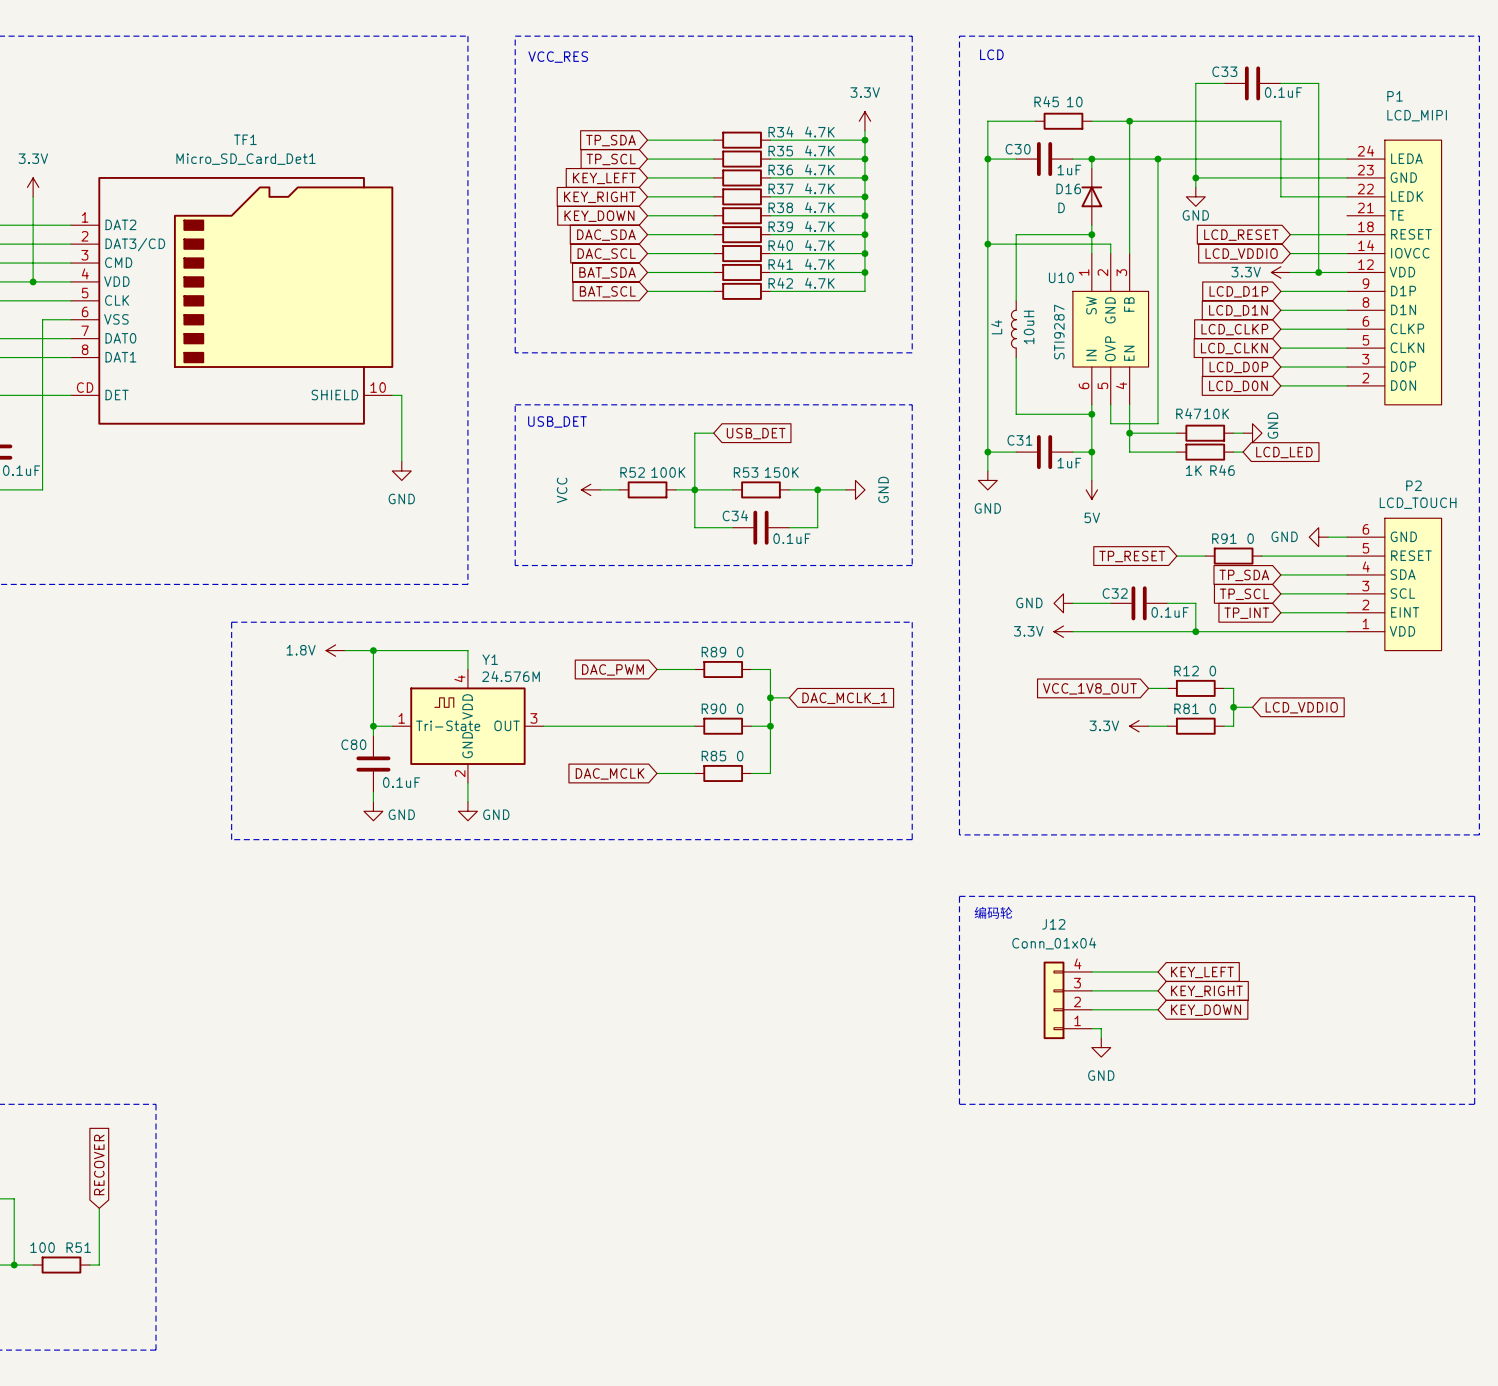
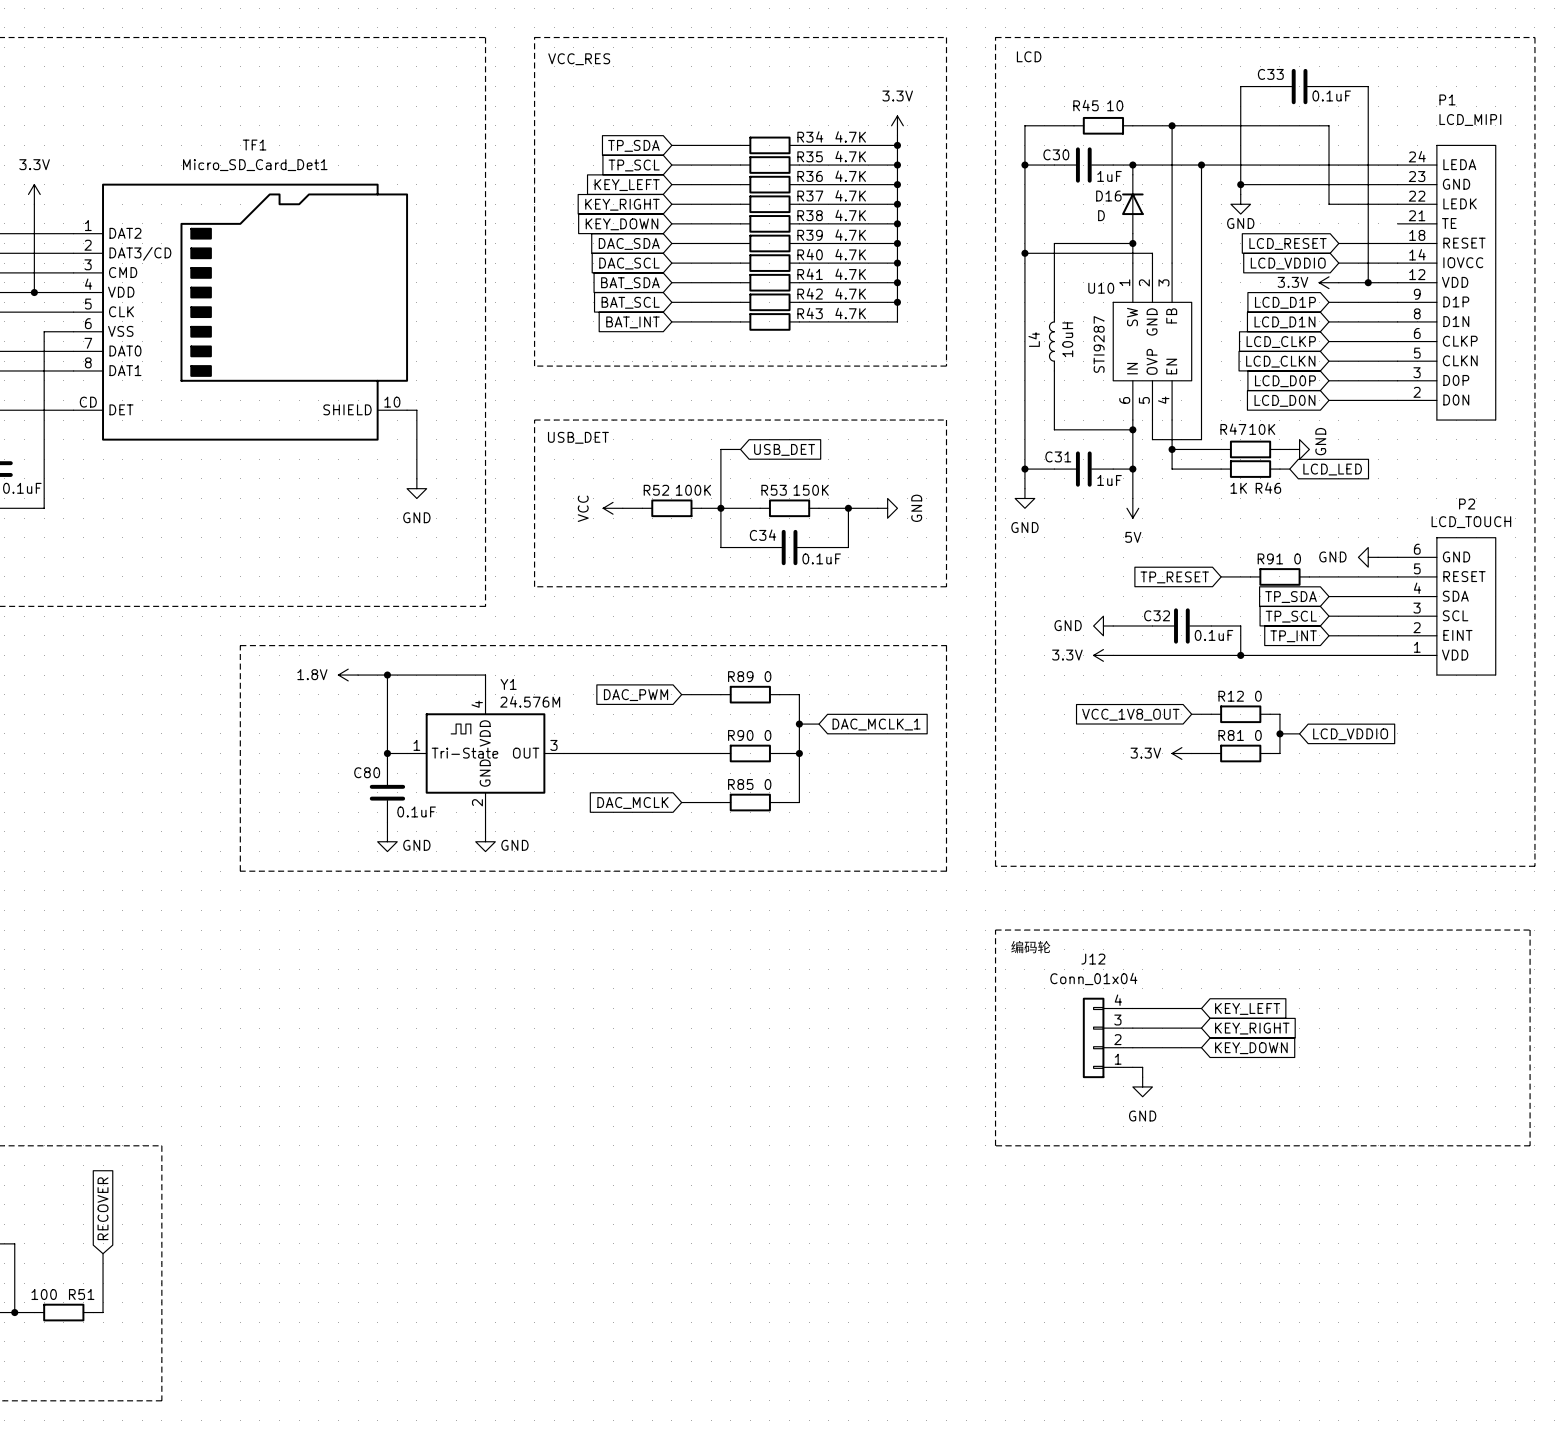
wire: none -> (897, 302) (897, 321) (799, 321)
junction: none -> (897, 302)
global label: none -> BAT_INT (632, 322)
wire: none -> (671, 321) (740, 321)
R43: none -> 4.7K (769, 321)

